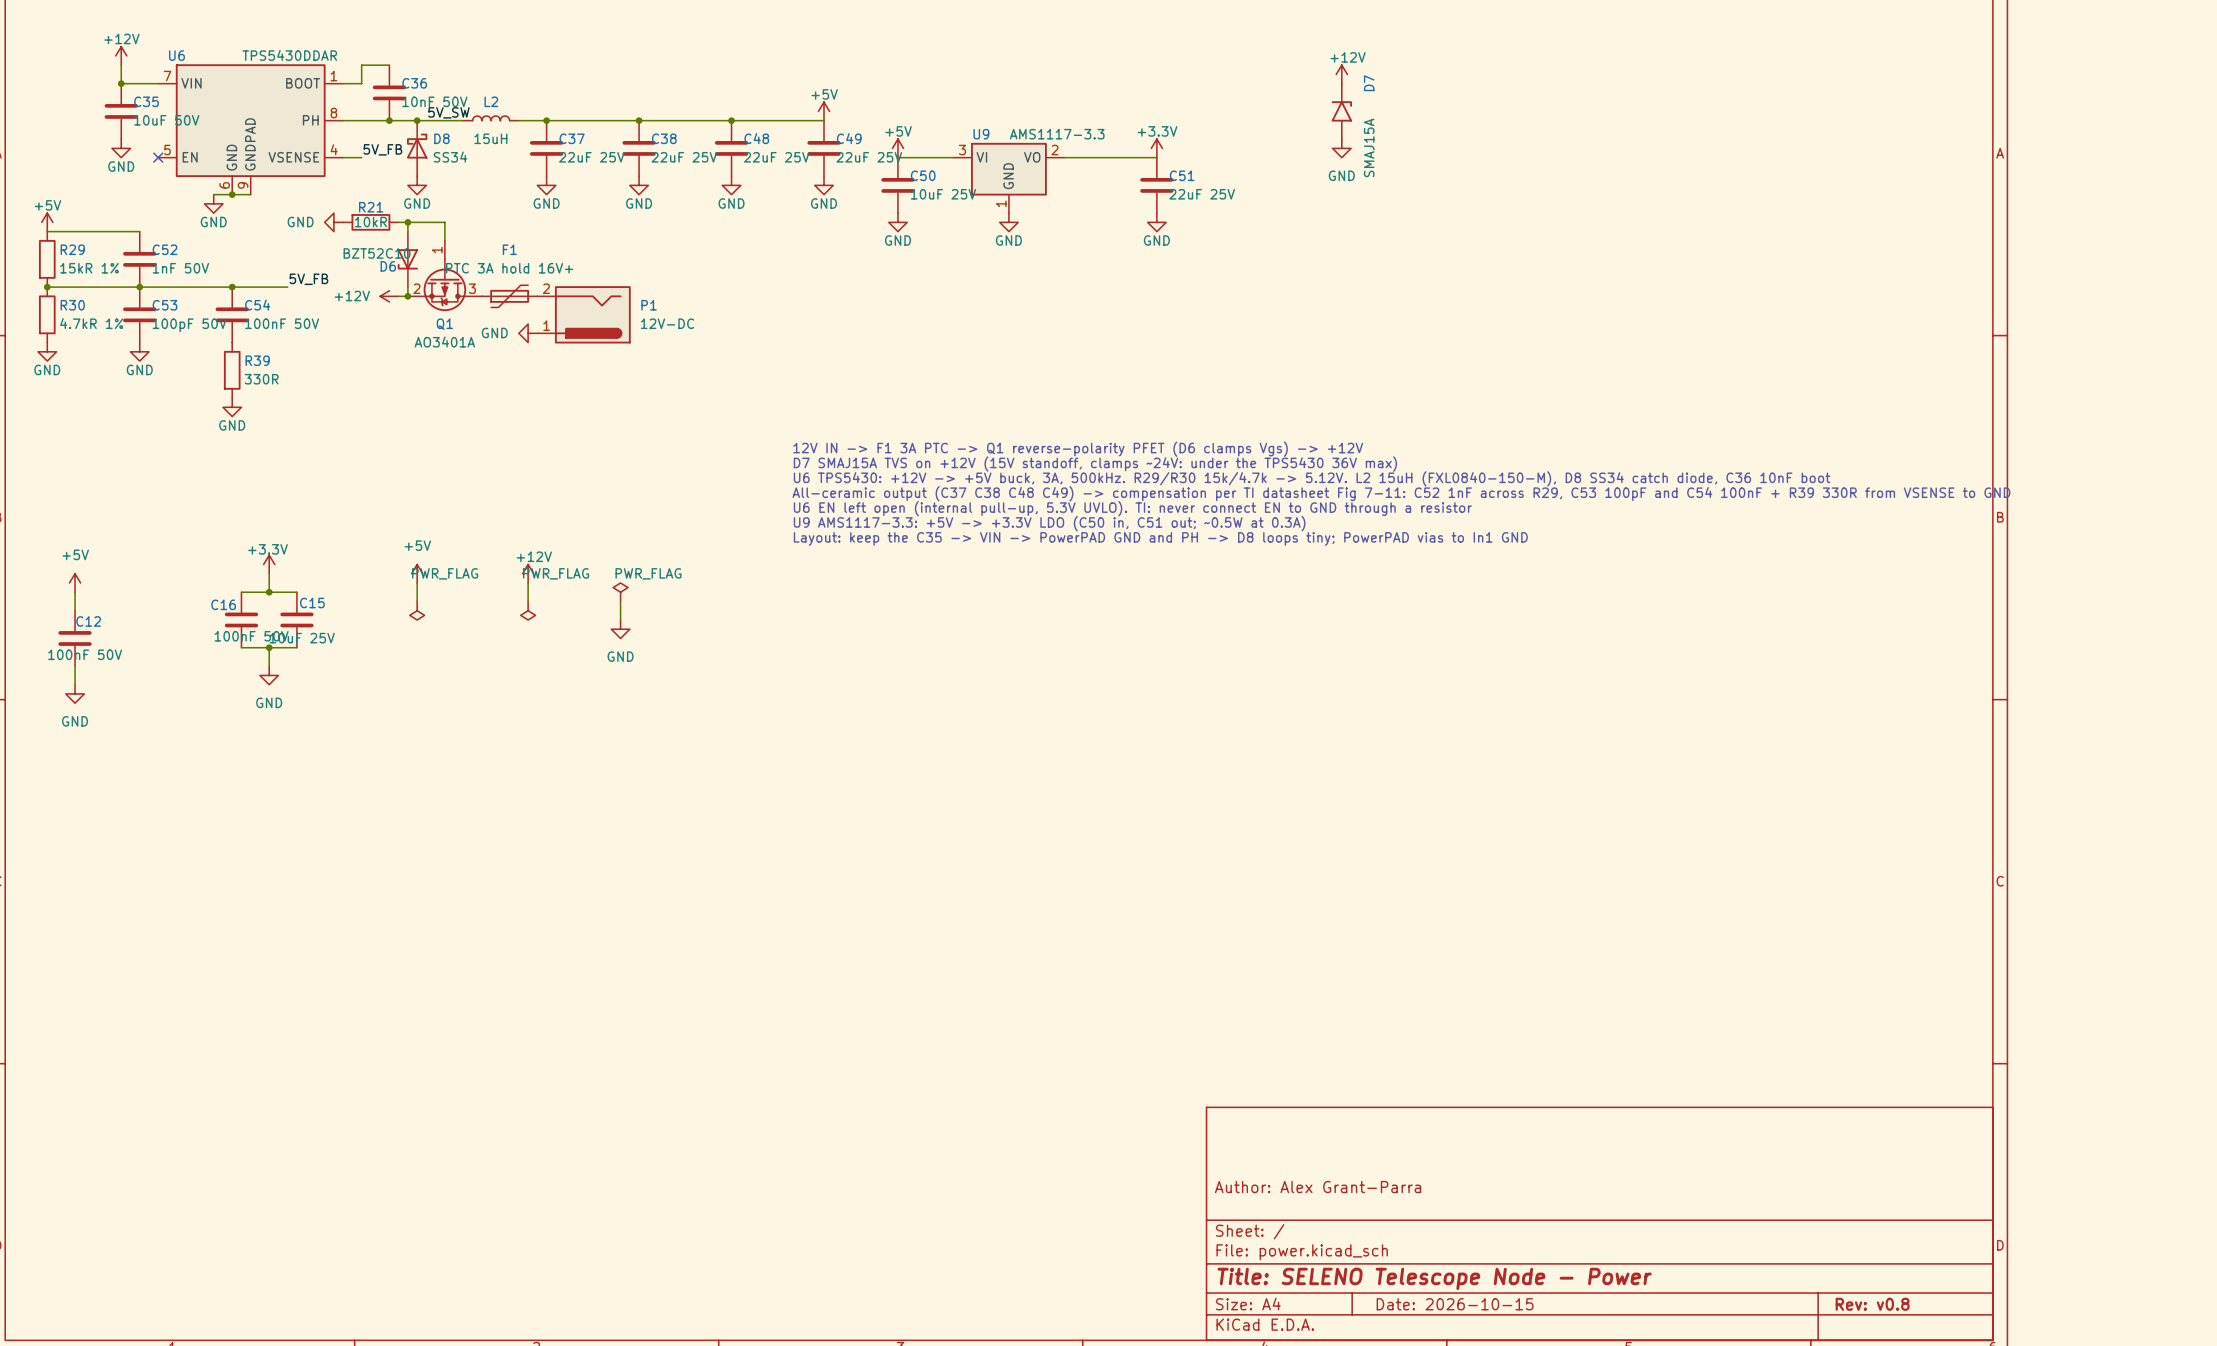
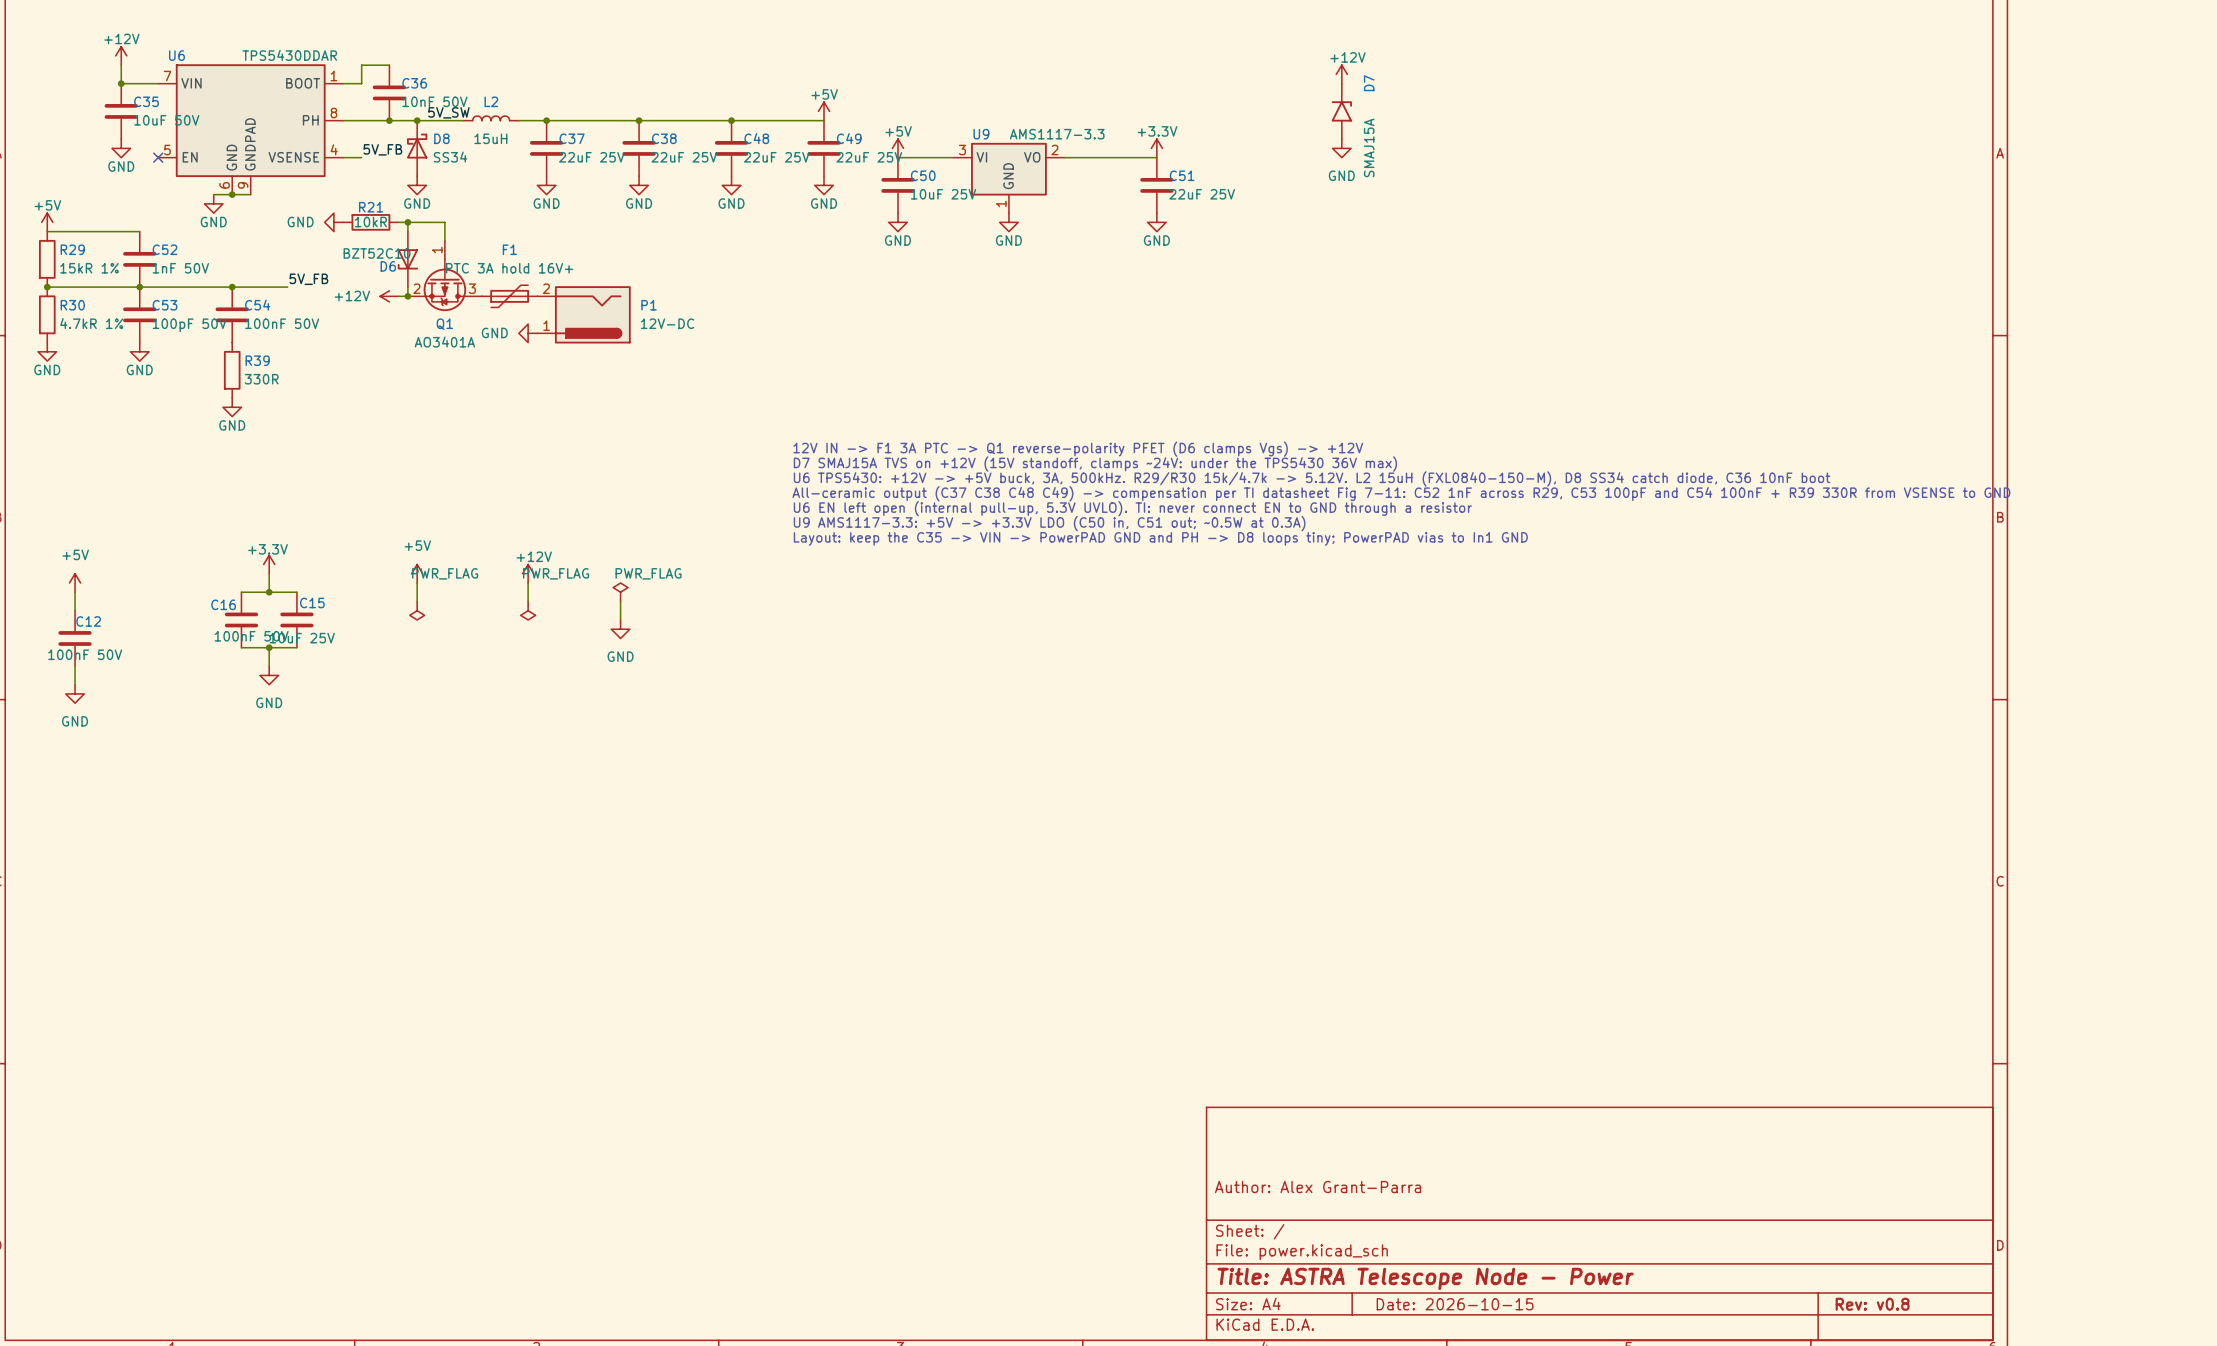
title block: Title: SELENO Telescope Node - Power (1434, 1278) -> Title: ASTRA Telescope Node - Power (1425, 1278)

